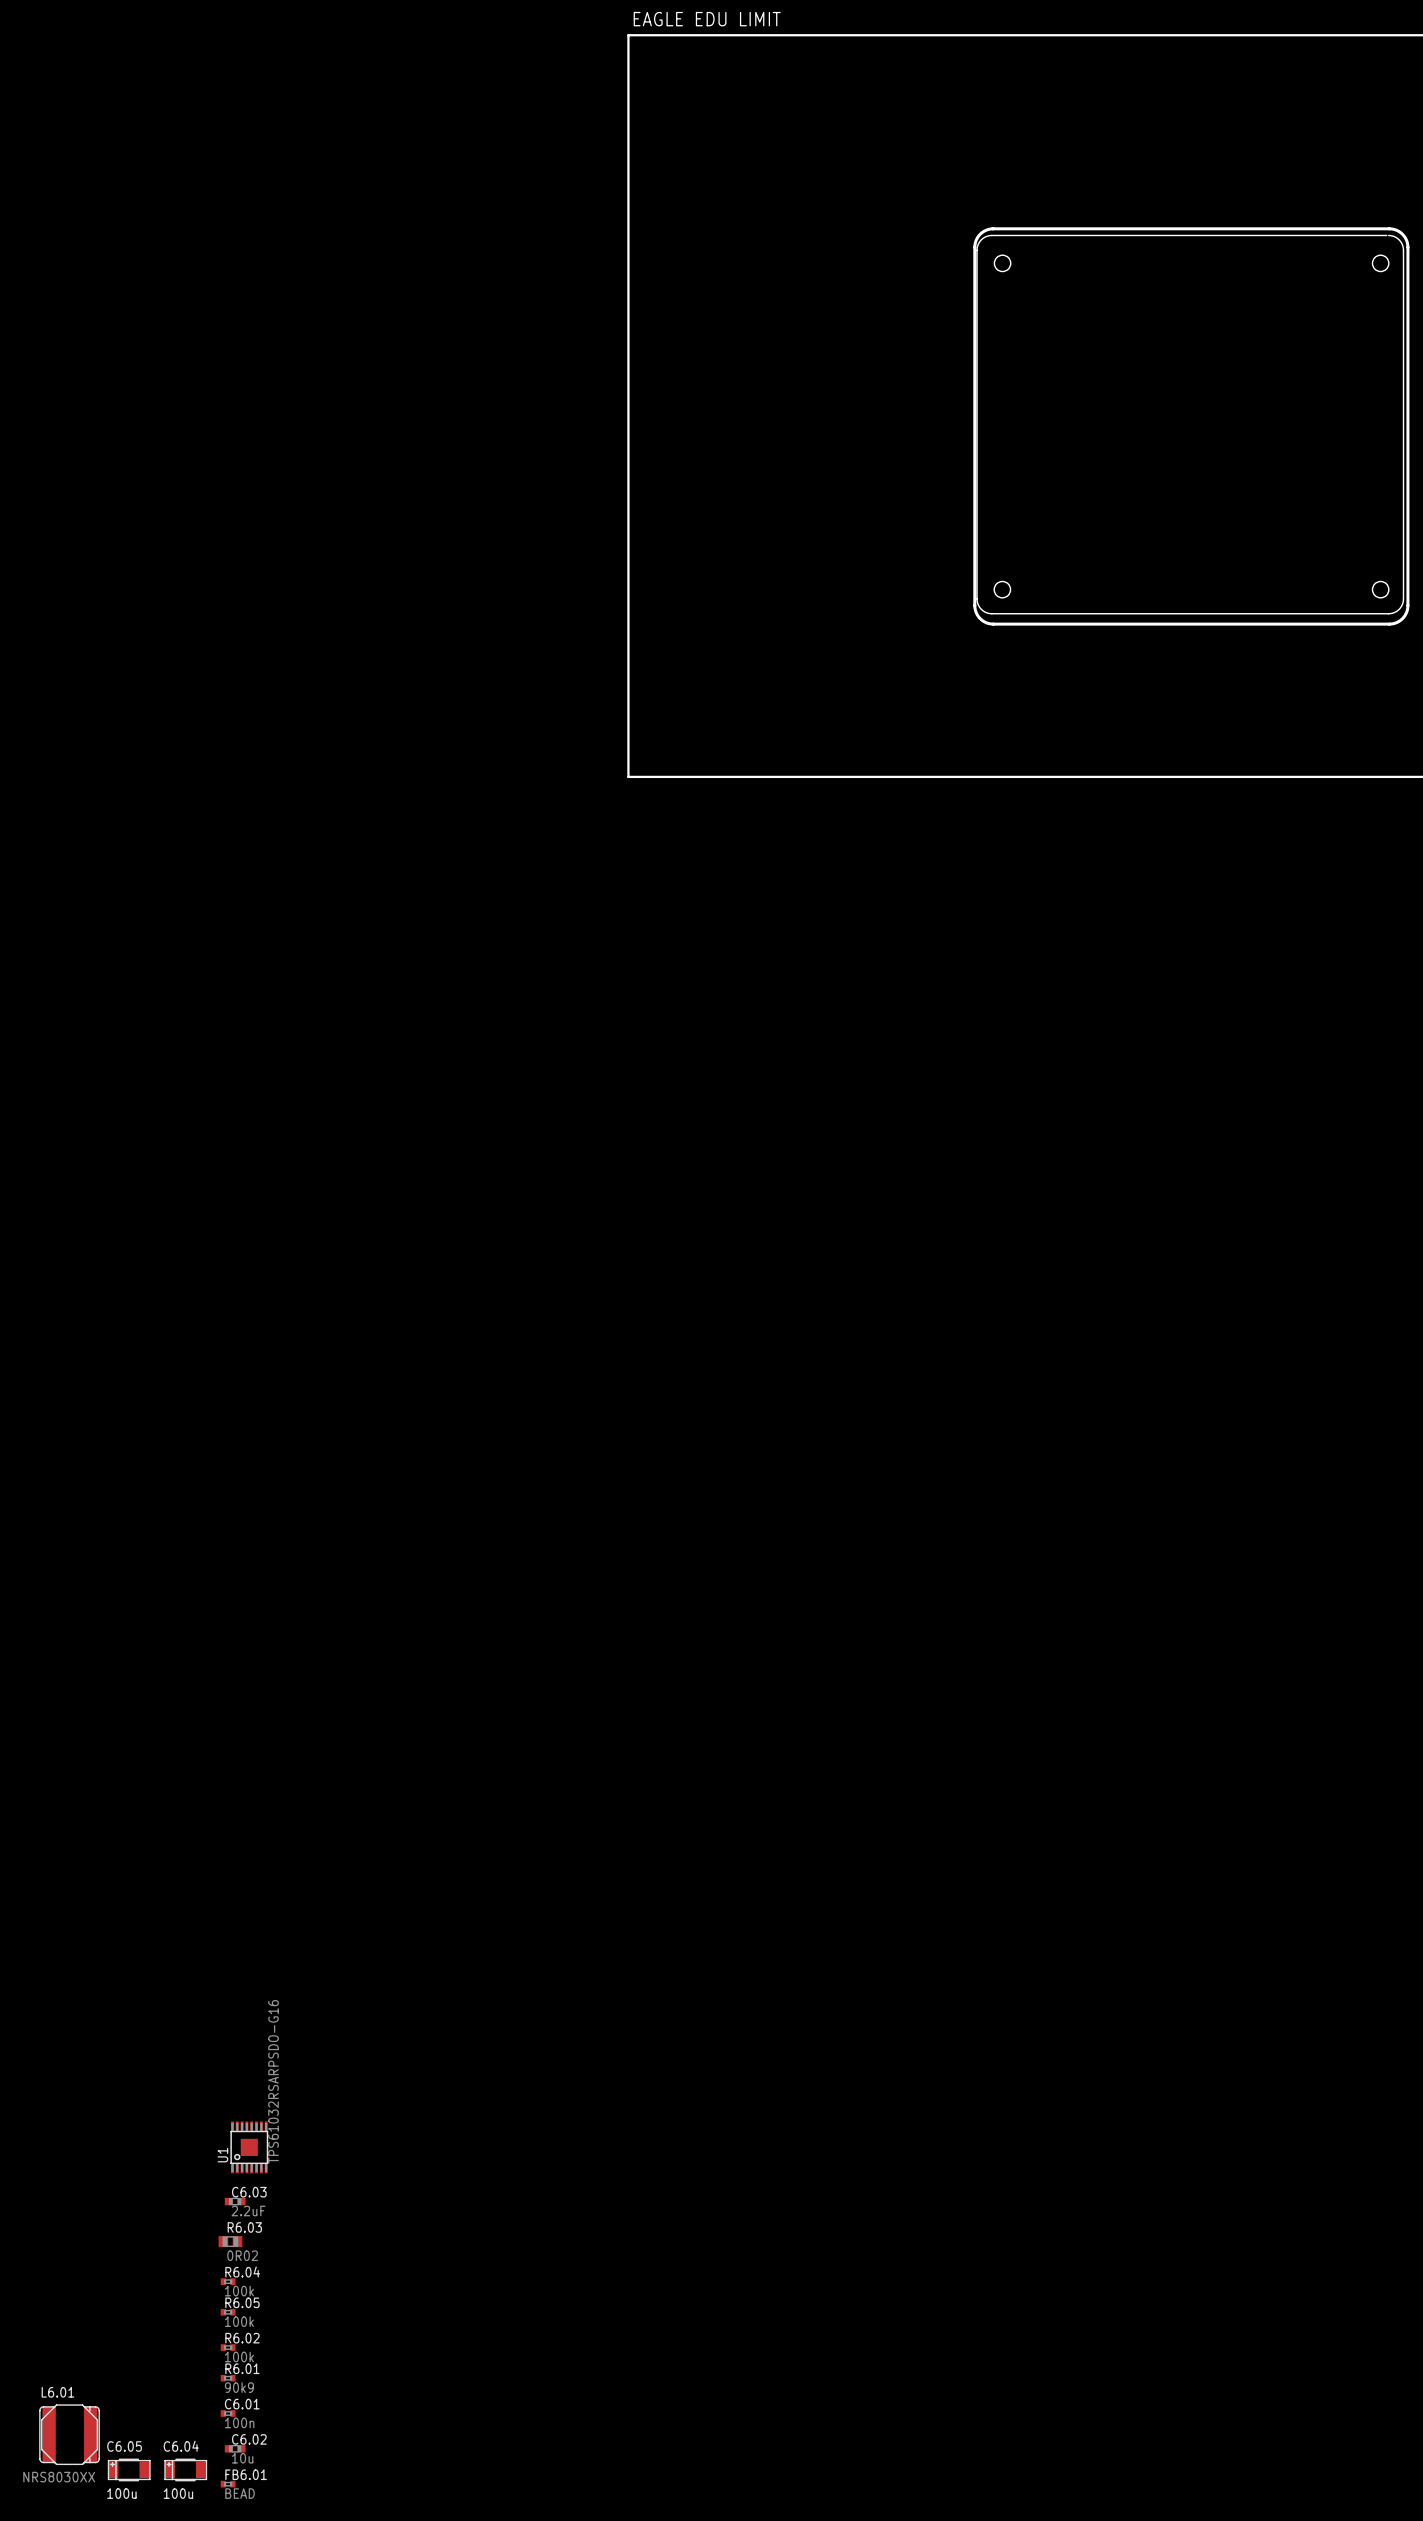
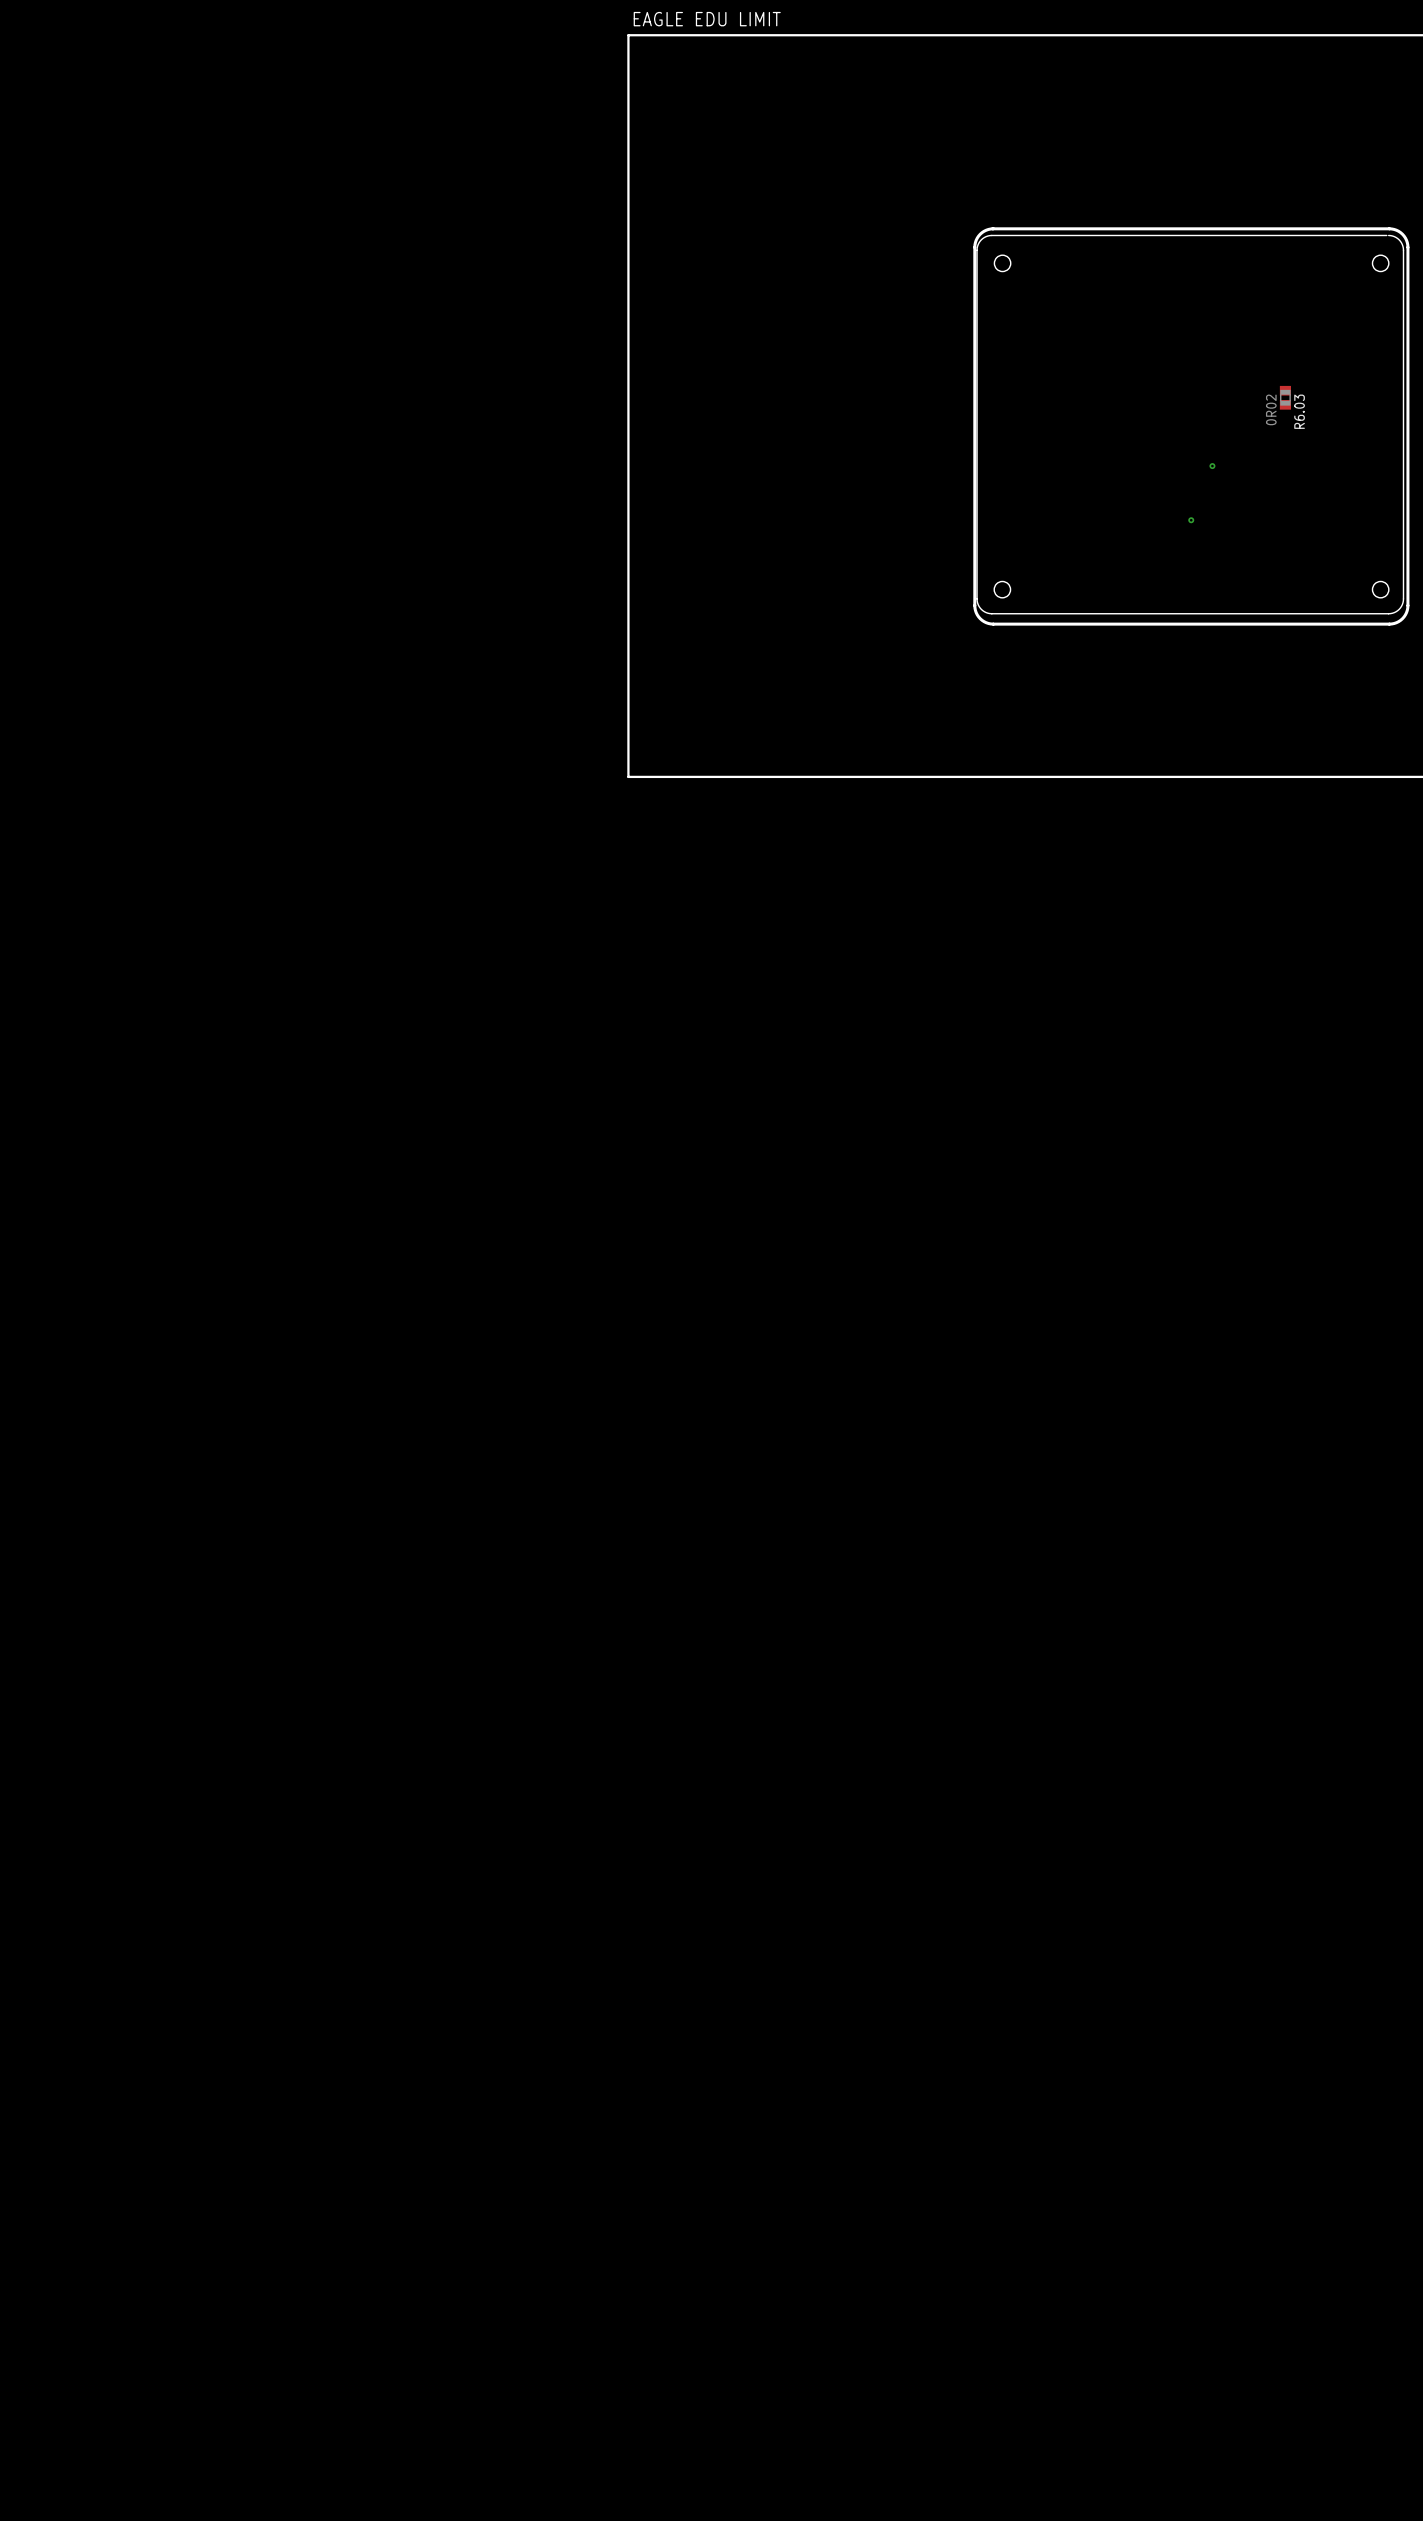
via: none -> (1212, 466)
via: none -> (1191, 520)
U1: TPS61032RSARPSDO-G16 (249, 2147) -> none
C6.03: 2.2uF (235, 2201) -> none
R6.03 rotation: 0° (230, 2241) -> 90° clockwise (1285, 397)
R6.03 position: (230, 2241) -> (1285, 397)
R6.04: 100k (228, 2281) -> none
R6.05: 100k (228, 2312) -> none
R6.02: 100k (228, 2347) -> none
R6.01: 90k9 (228, 2378) -> none
C6.01: 100n (228, 2413) -> none
L6.01: NRS8030XX (69, 2434) -> none
C6.02: 10u (235, 2448) -> none
C6.05: 100u (129, 2469) -> none
C6.04: 100u (185, 2469) -> none
FB6.01: BEAD (228, 2484) -> none

